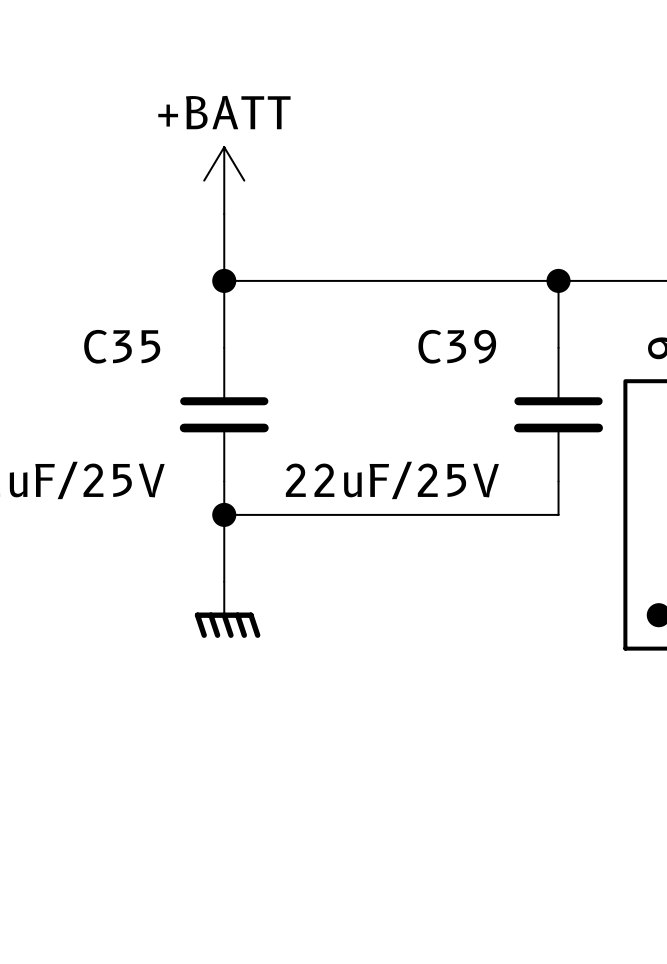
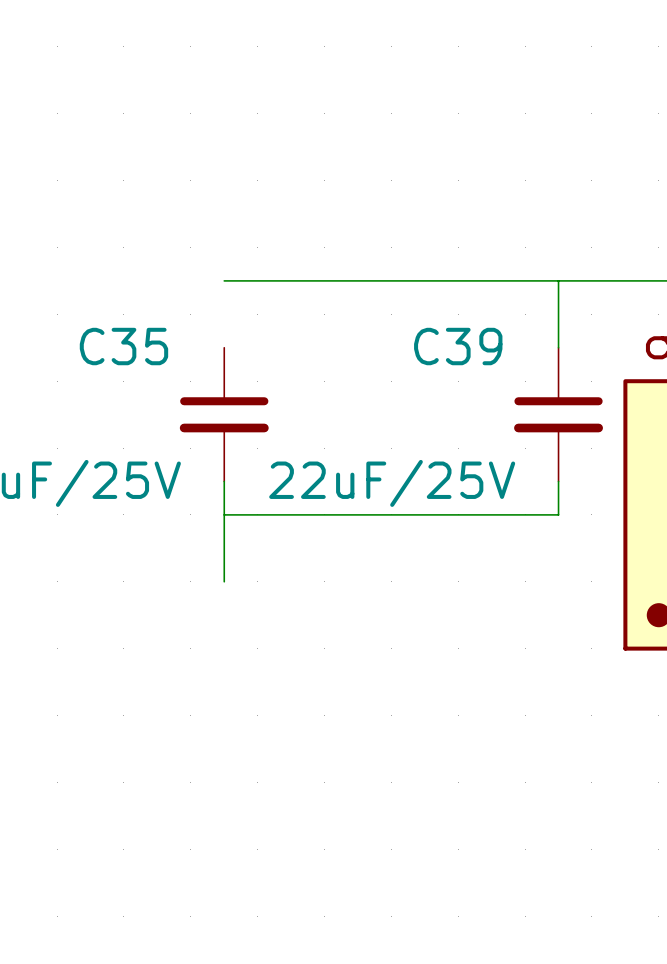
power symbol: +BATT (224, 180) -> none
wire: (224, 214) (224, 347) -> none
junction: (224, 280) -> none
junction: (558, 280) -> none
junction: (224, 514) -> none
power symbol: (227, 609) -> none

